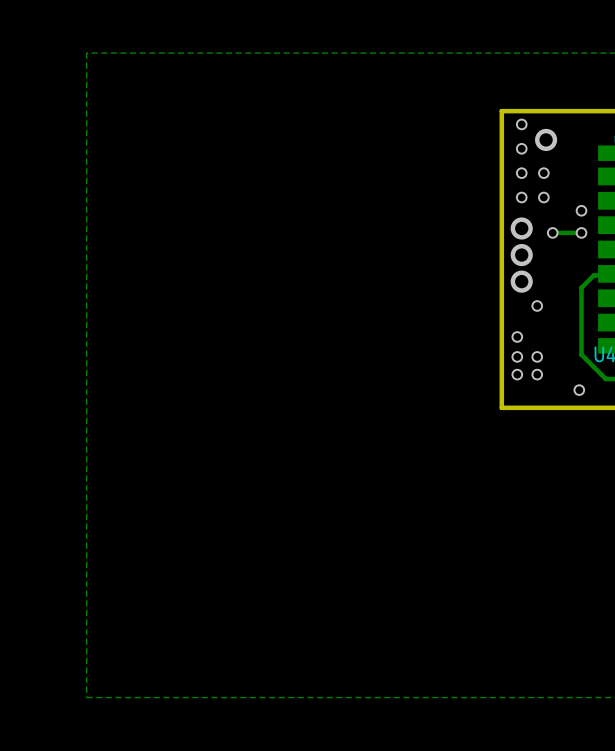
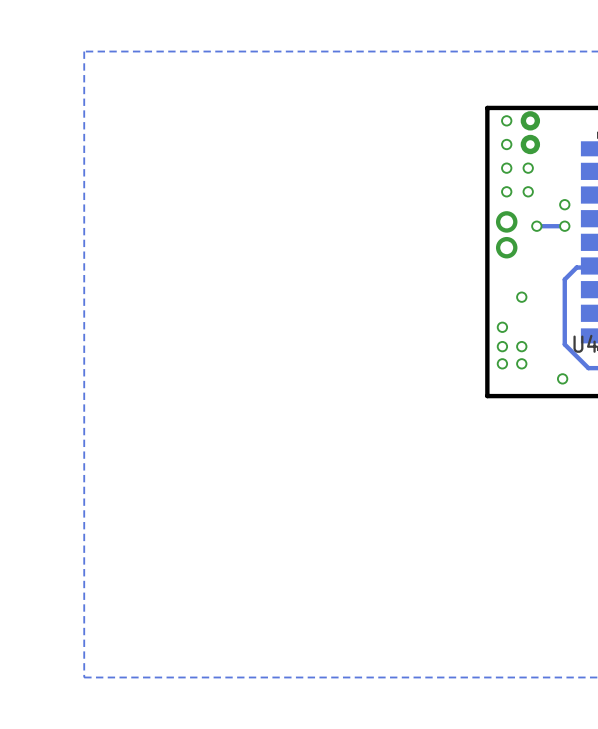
via: none -> (530, 120)
via: (546, 139) -> none
via: none -> (530, 144)
via: (521, 281) -> none

